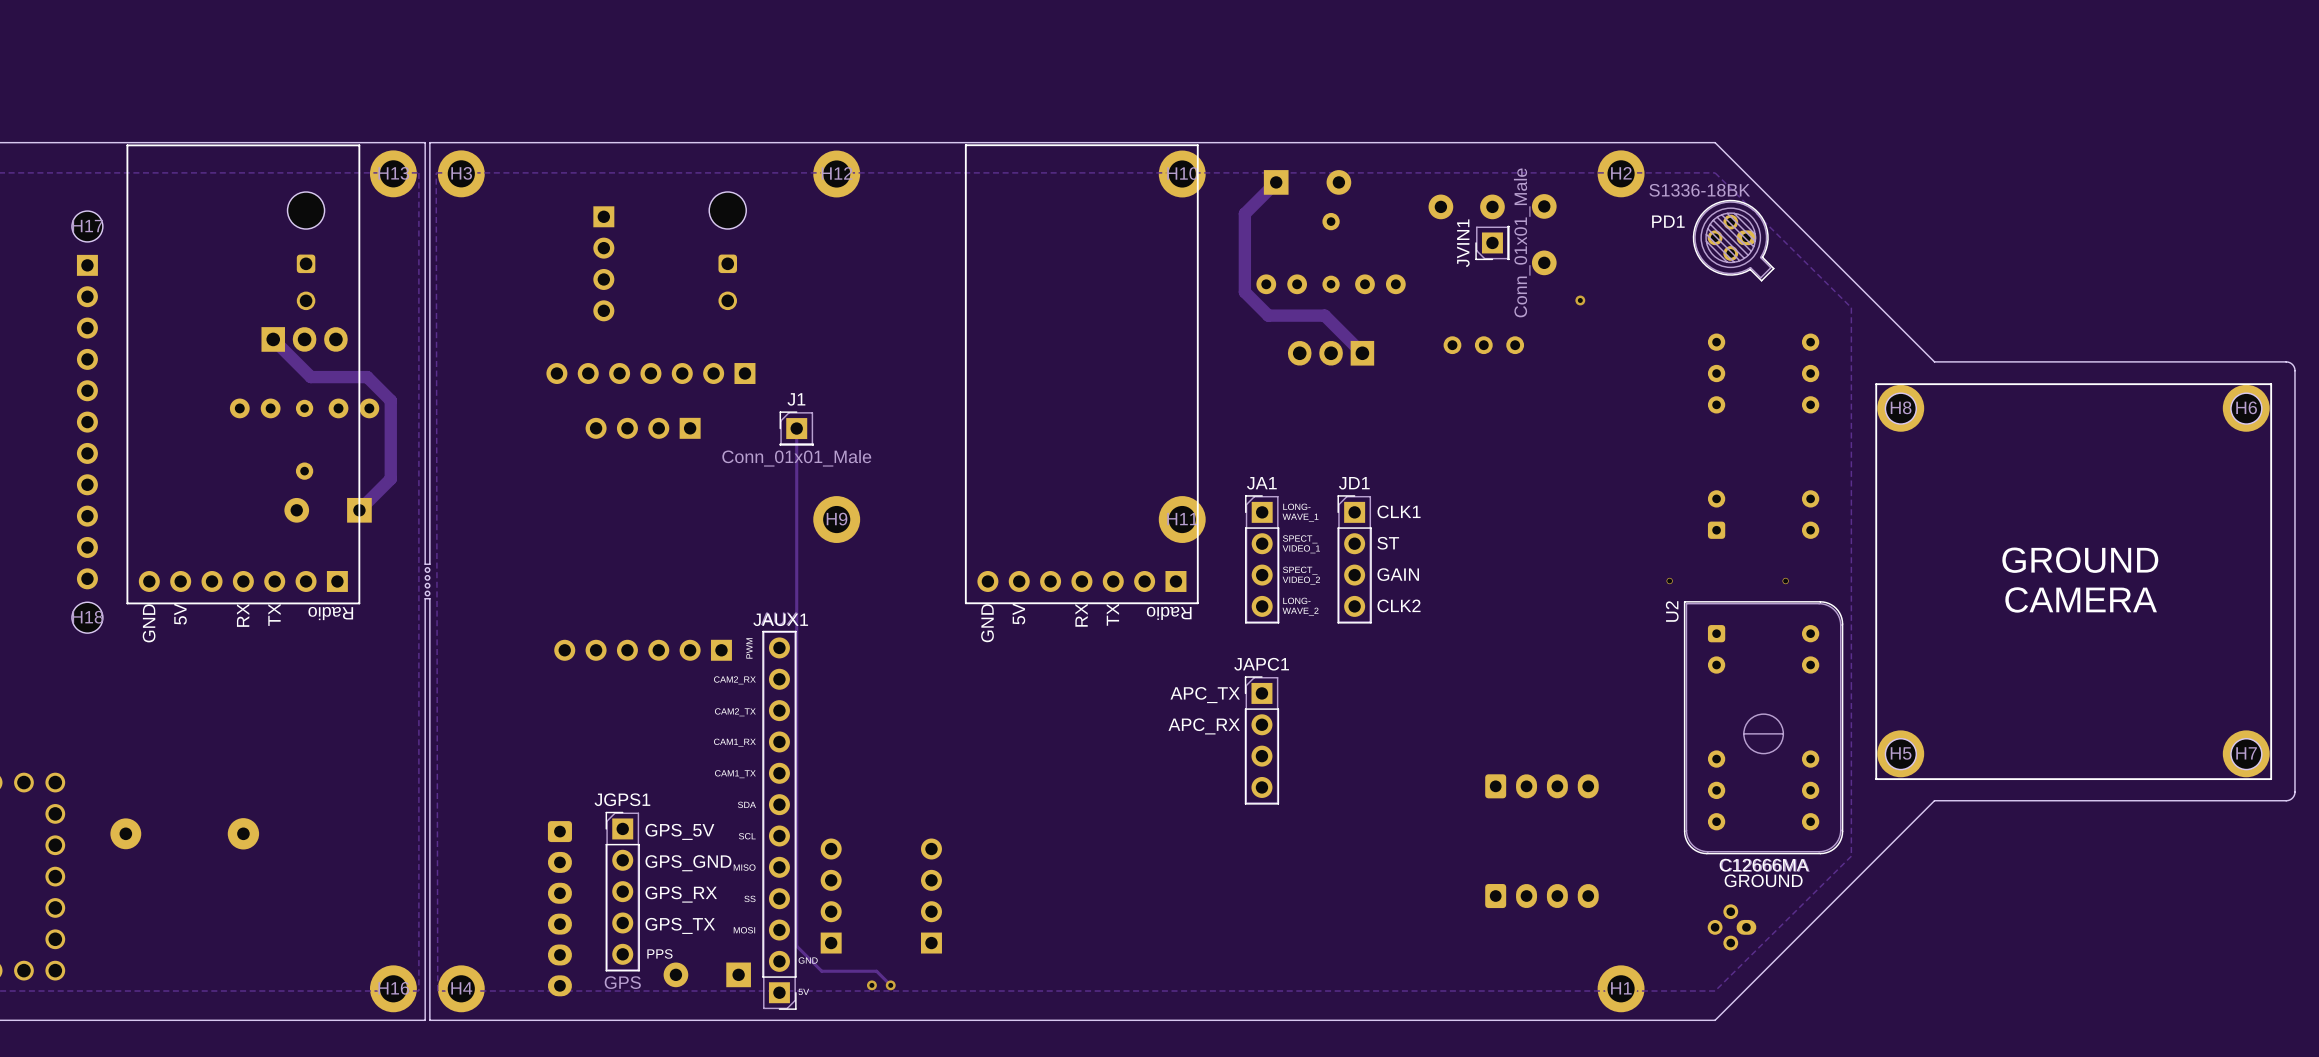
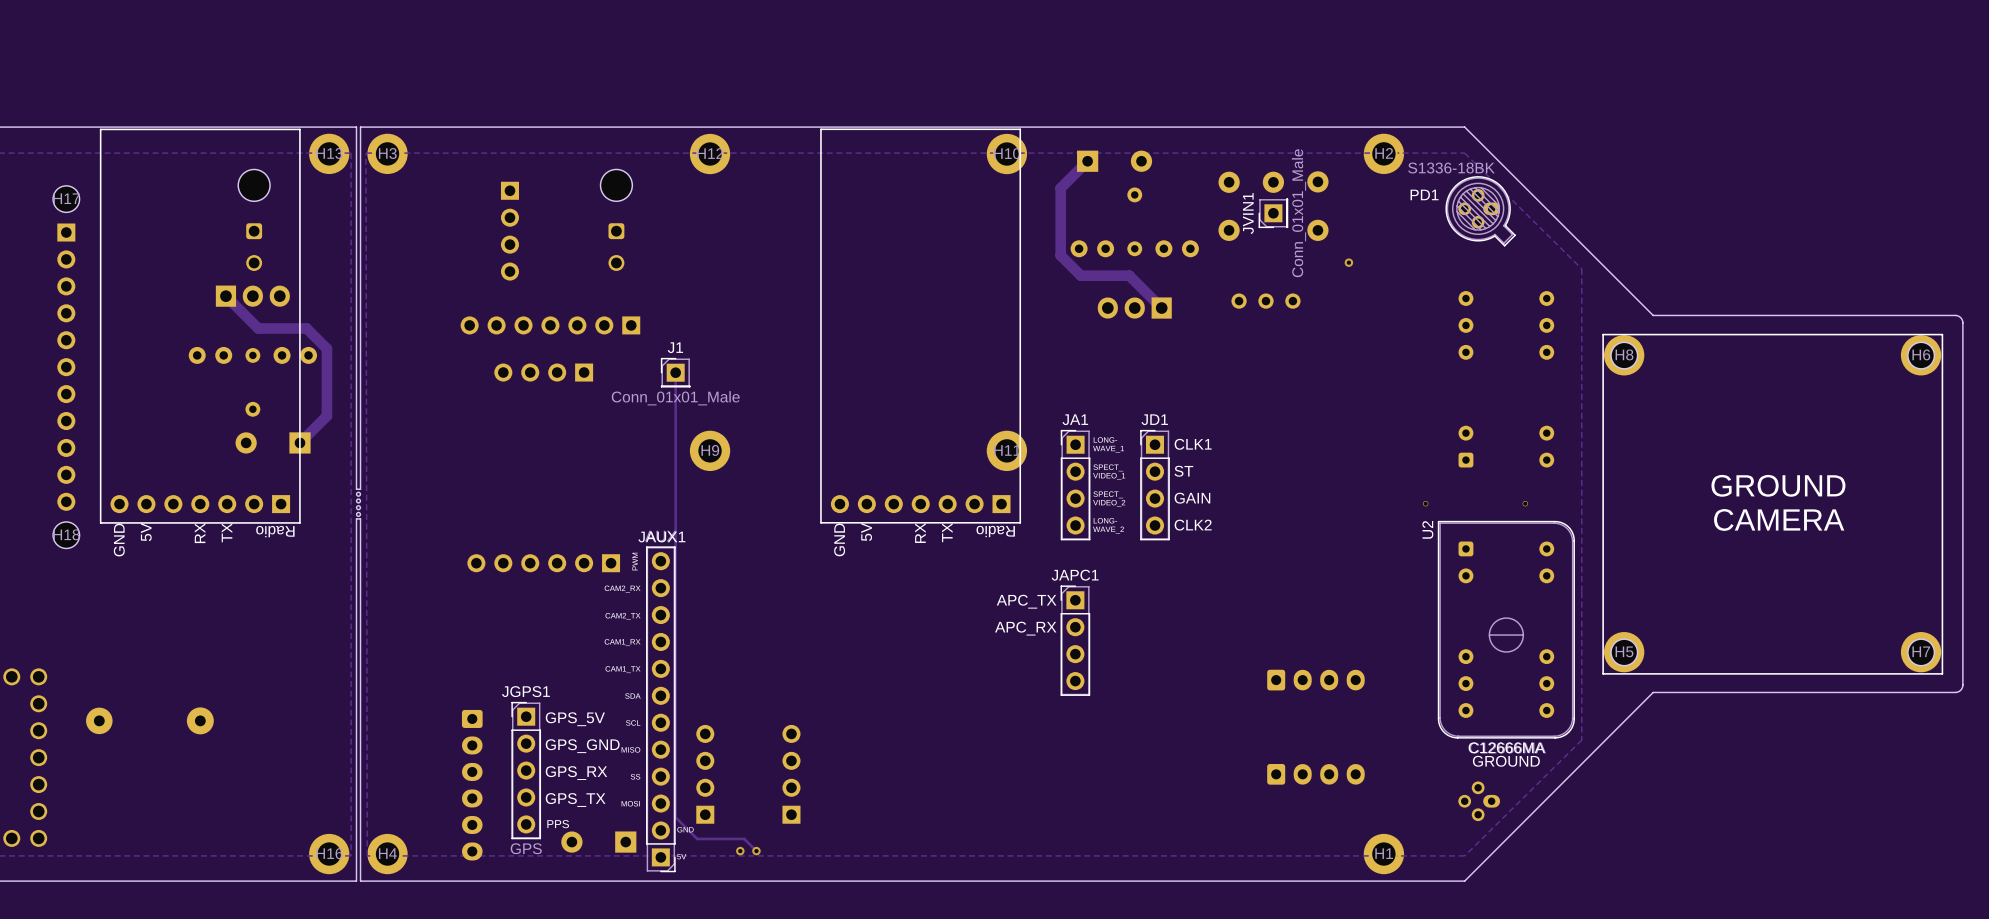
part: none -> (1229, 230)

